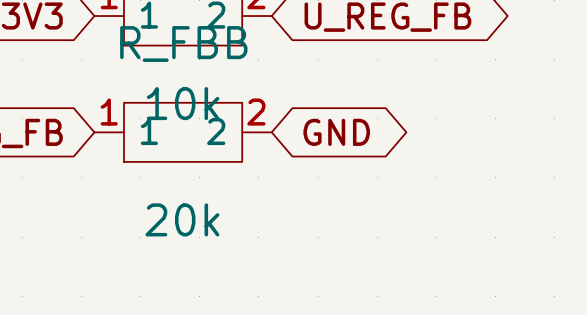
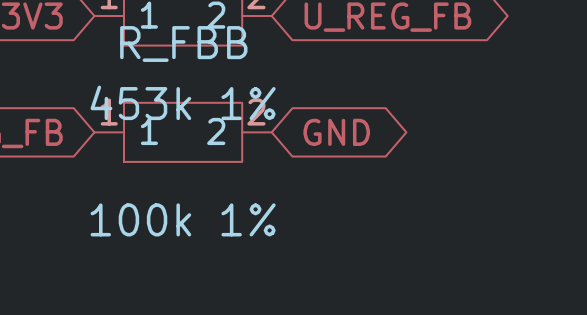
part value: 10k (183, 103) -> 453k 1% (183, 102)
R_FBB value: 20k (182, 219) -> 100k 1% (183, 219)

